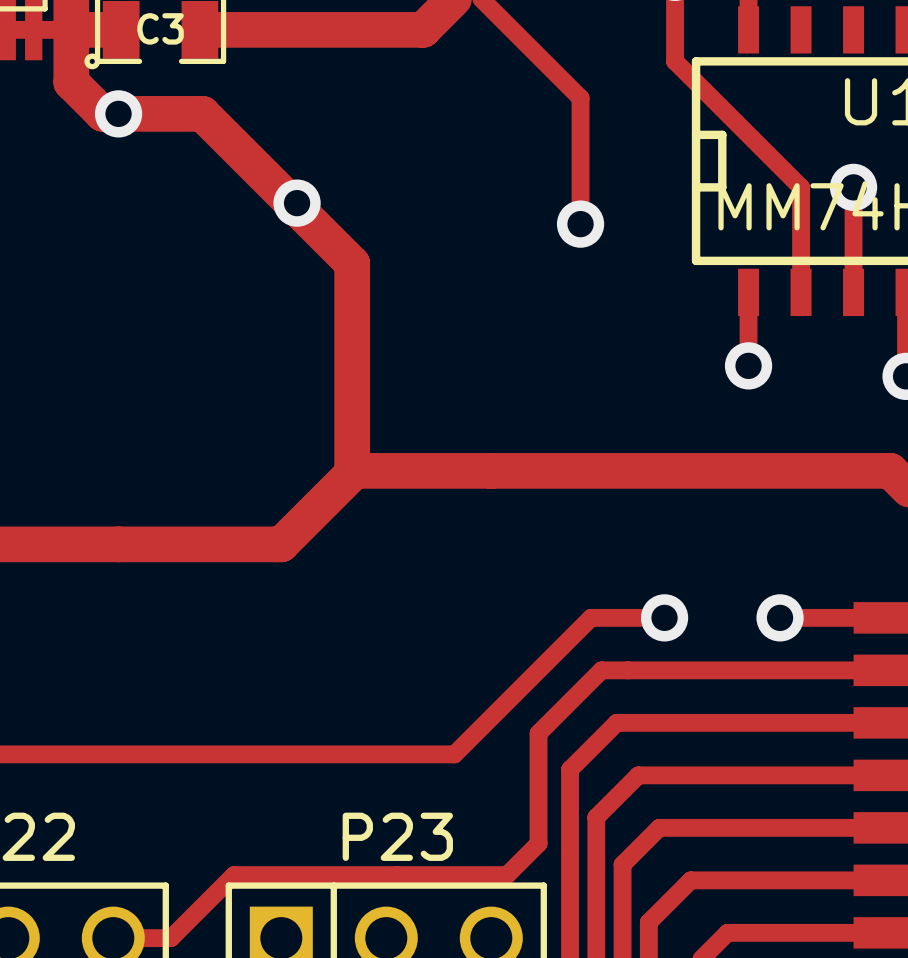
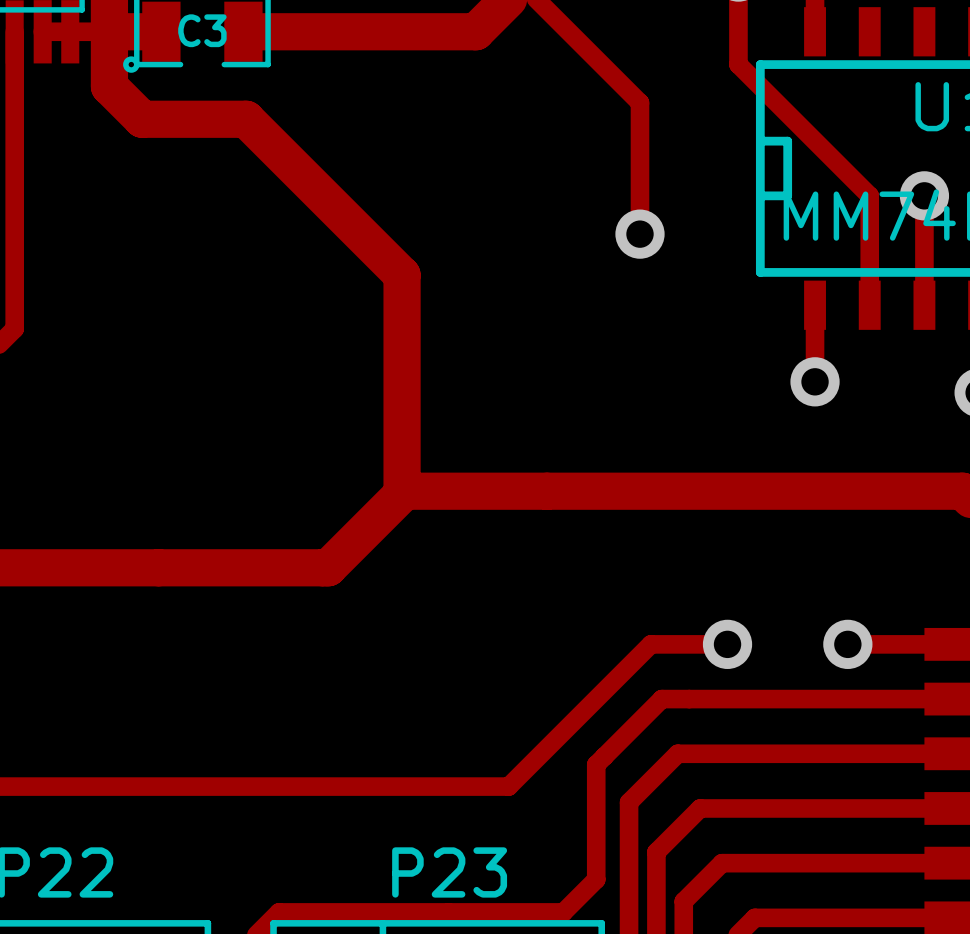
via: (118, 113) -> none
via: (297, 203) -> none

